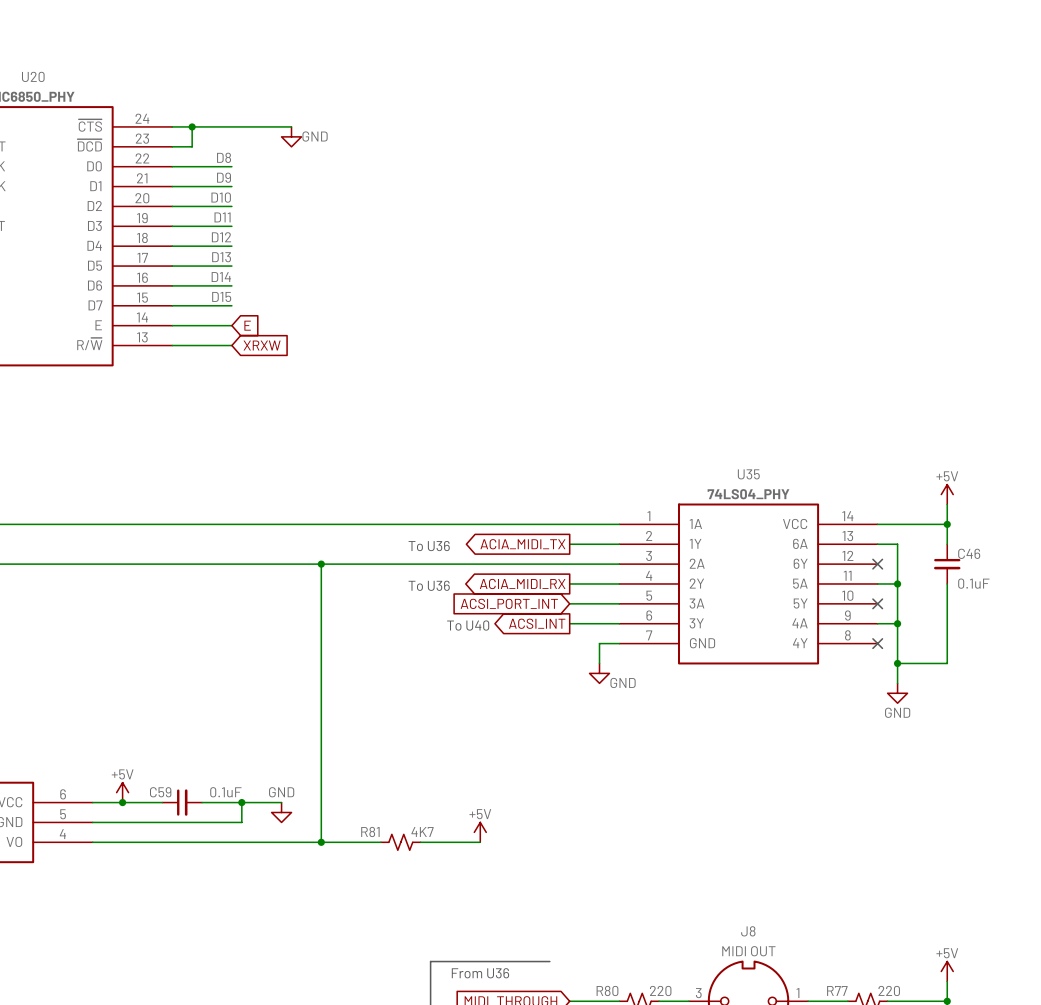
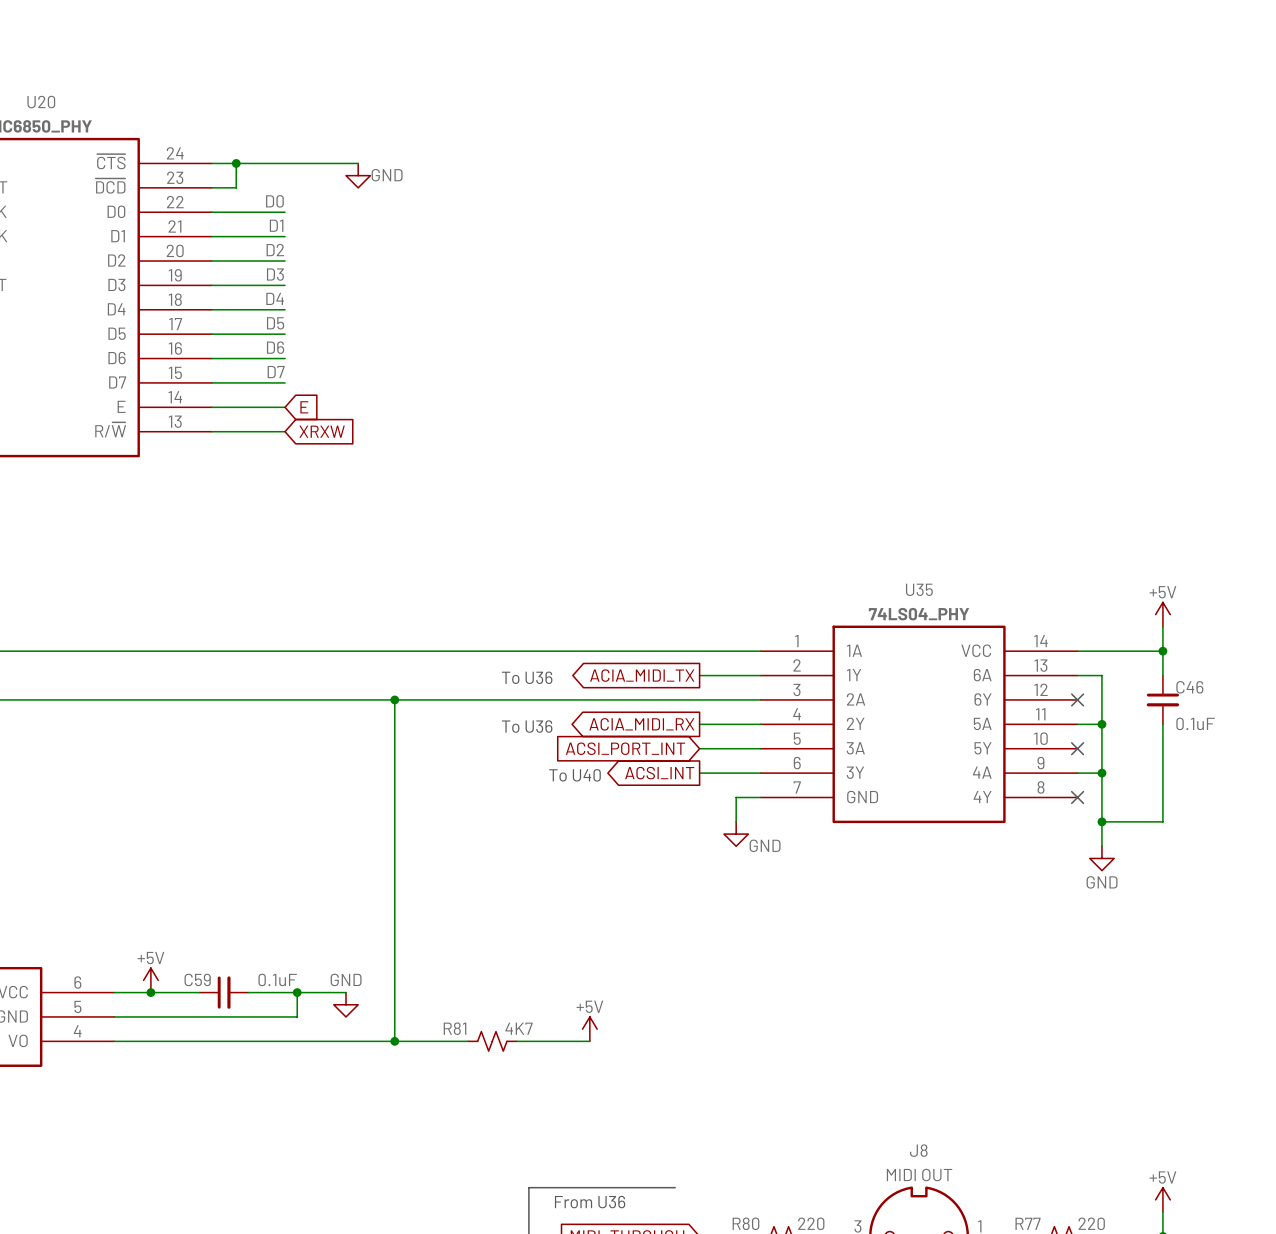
label: D8 (224, 157) -> D0 (274, 201)
label: D9 (224, 177) -> D1 (276, 225)
label: D10 (221, 197) -> D2 (275, 250)
label: D11 (222, 217) -> D3 (275, 274)
label: D12 (221, 237) -> D4 (275, 298)
label: D13 (221, 257) -> D5 (275, 323)
label: D14 (221, 277) -> D6 (275, 347)
label: D15 (221, 296) -> D7 (276, 372)

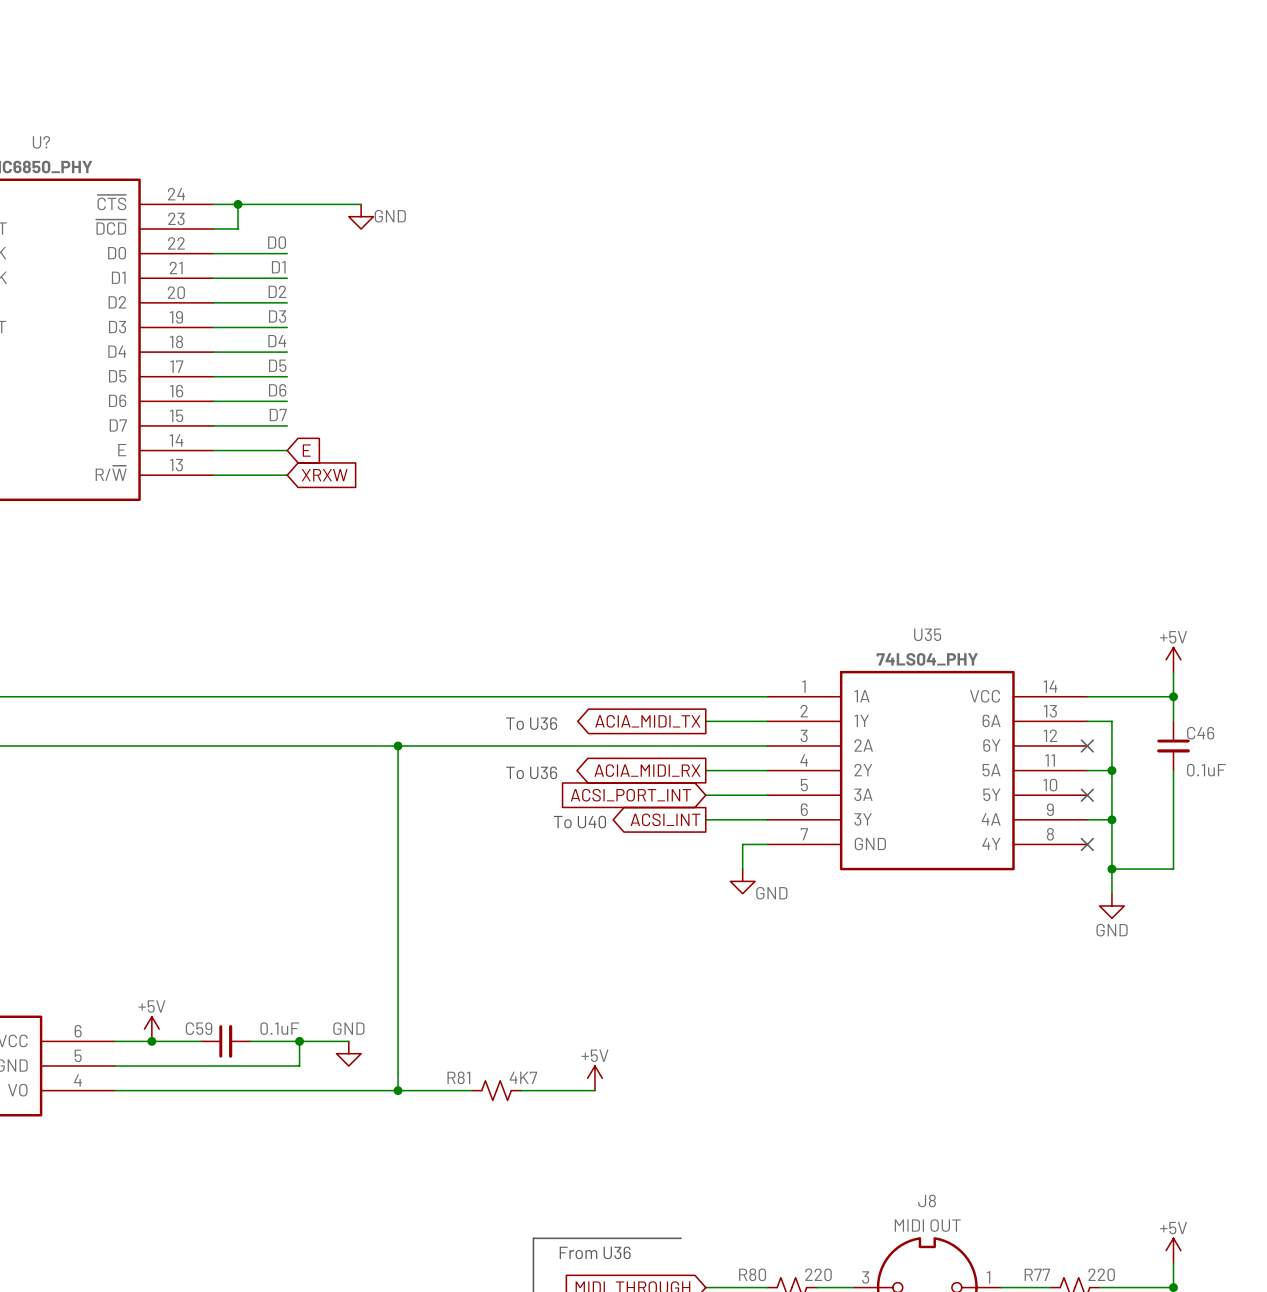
U20 name: U20 (41, 102) -> U? (41, 142)

